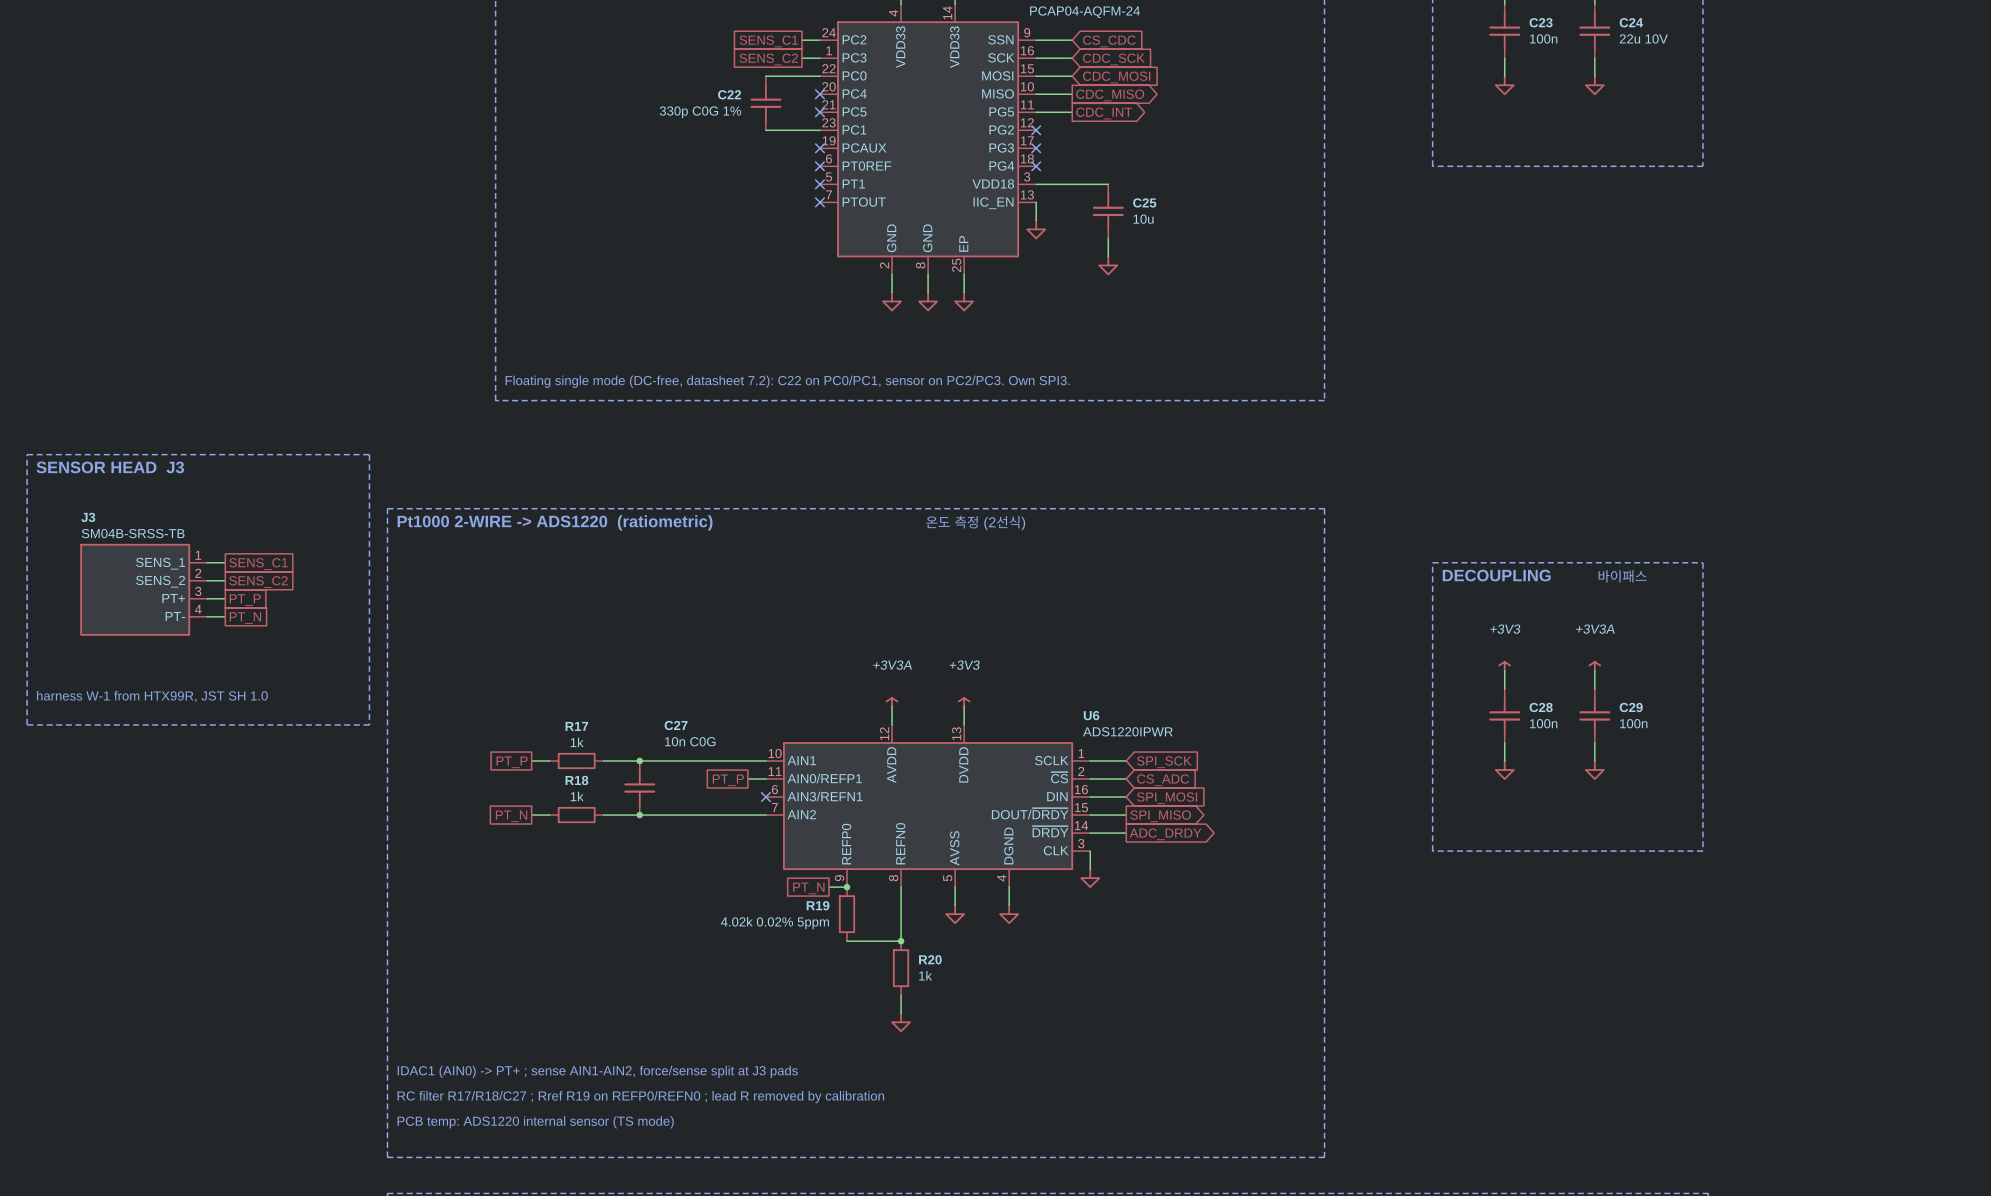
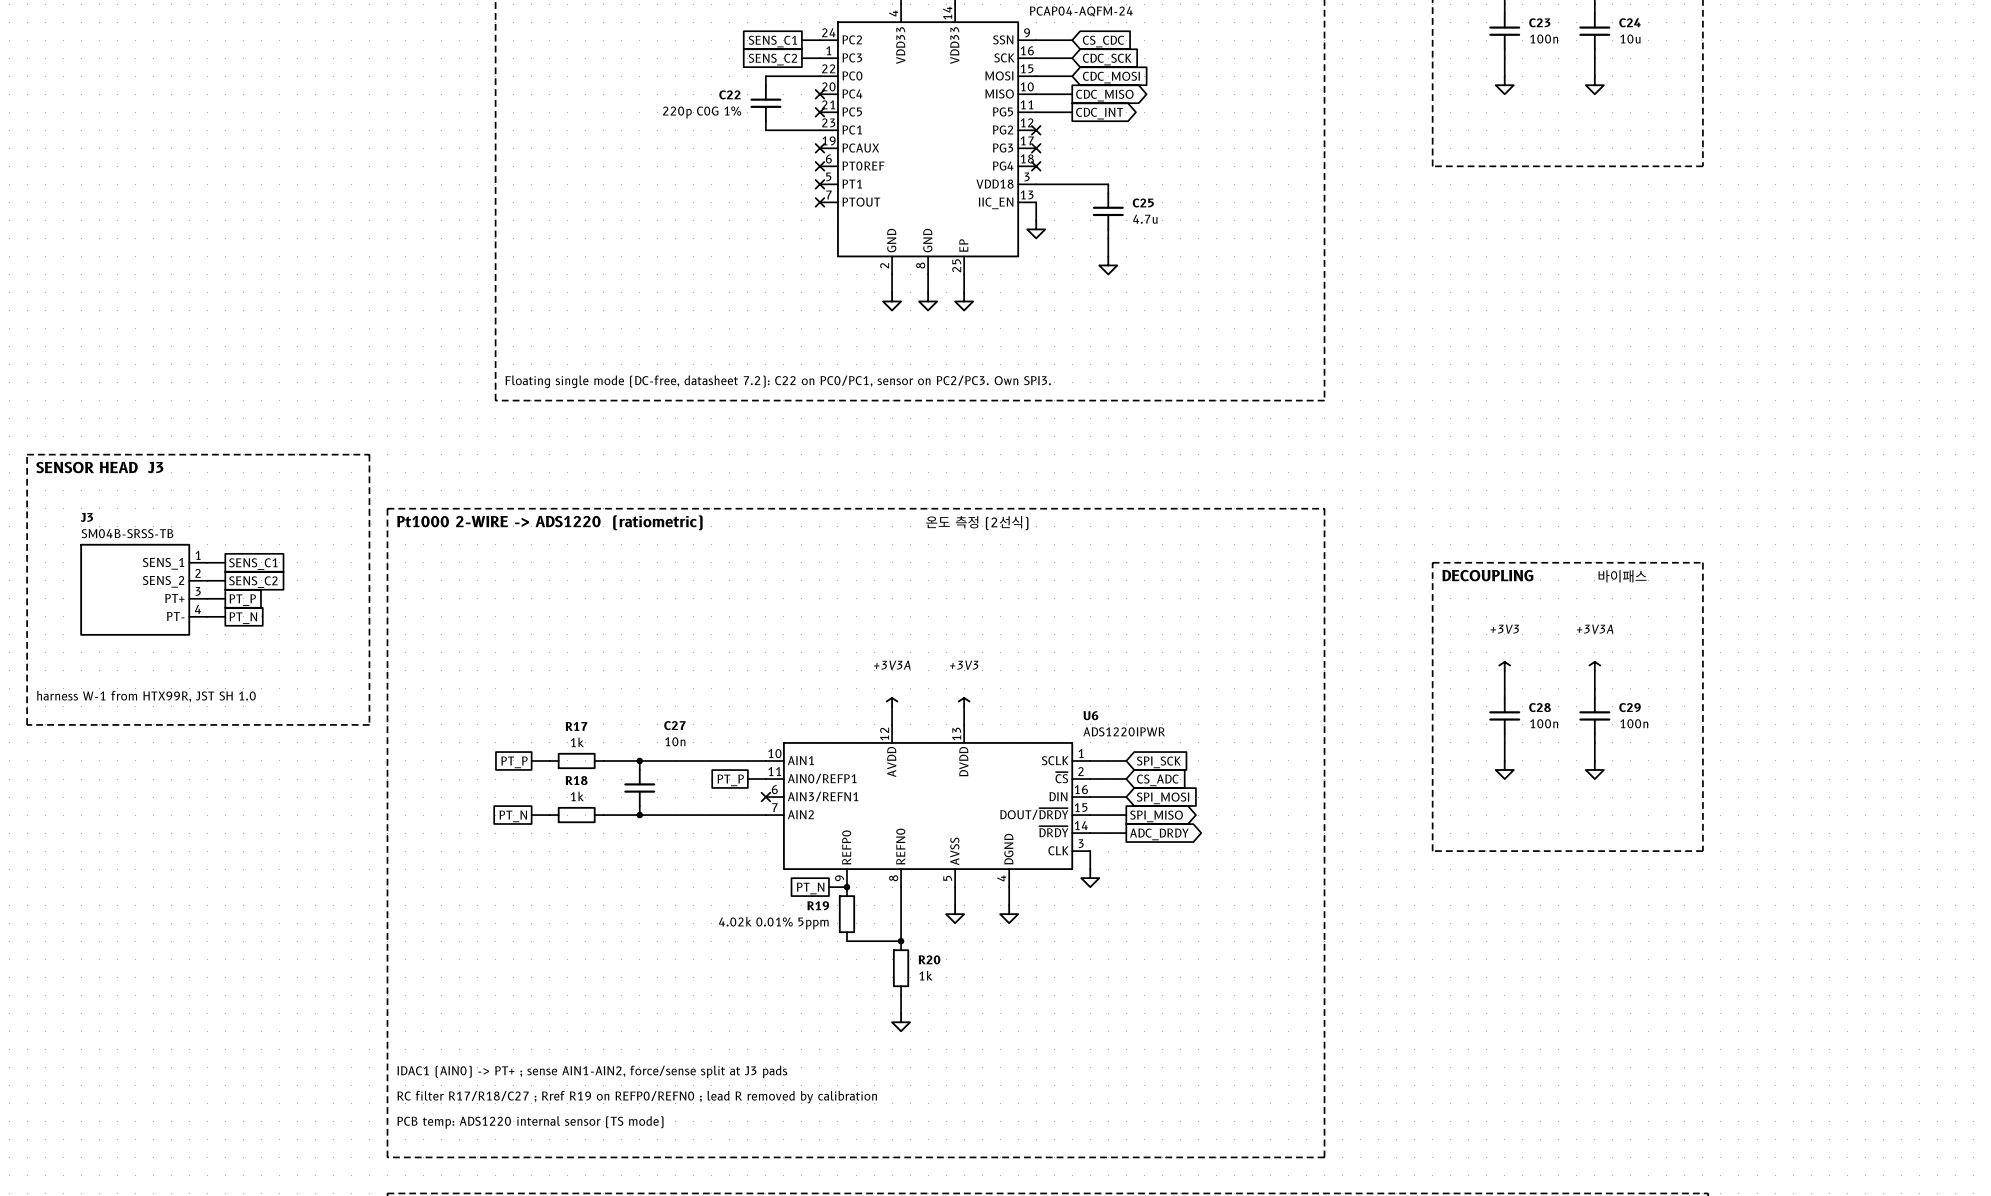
C24 value: 22u 10V (1643, 38) -> 10u (1630, 39)
C22 value: 330p C0G 1% (700, 112) -> 220p C0G 1% (702, 112)
C25 value: 10u (1143, 219) -> 4.7u (1145, 219)
C27 value: 10n C0G (690, 741) -> 10n (675, 741)
R19 value: 4.02k 0.02% 5ppm (774, 923) -> 4.02k 0.01% 5ppm (773, 923)

